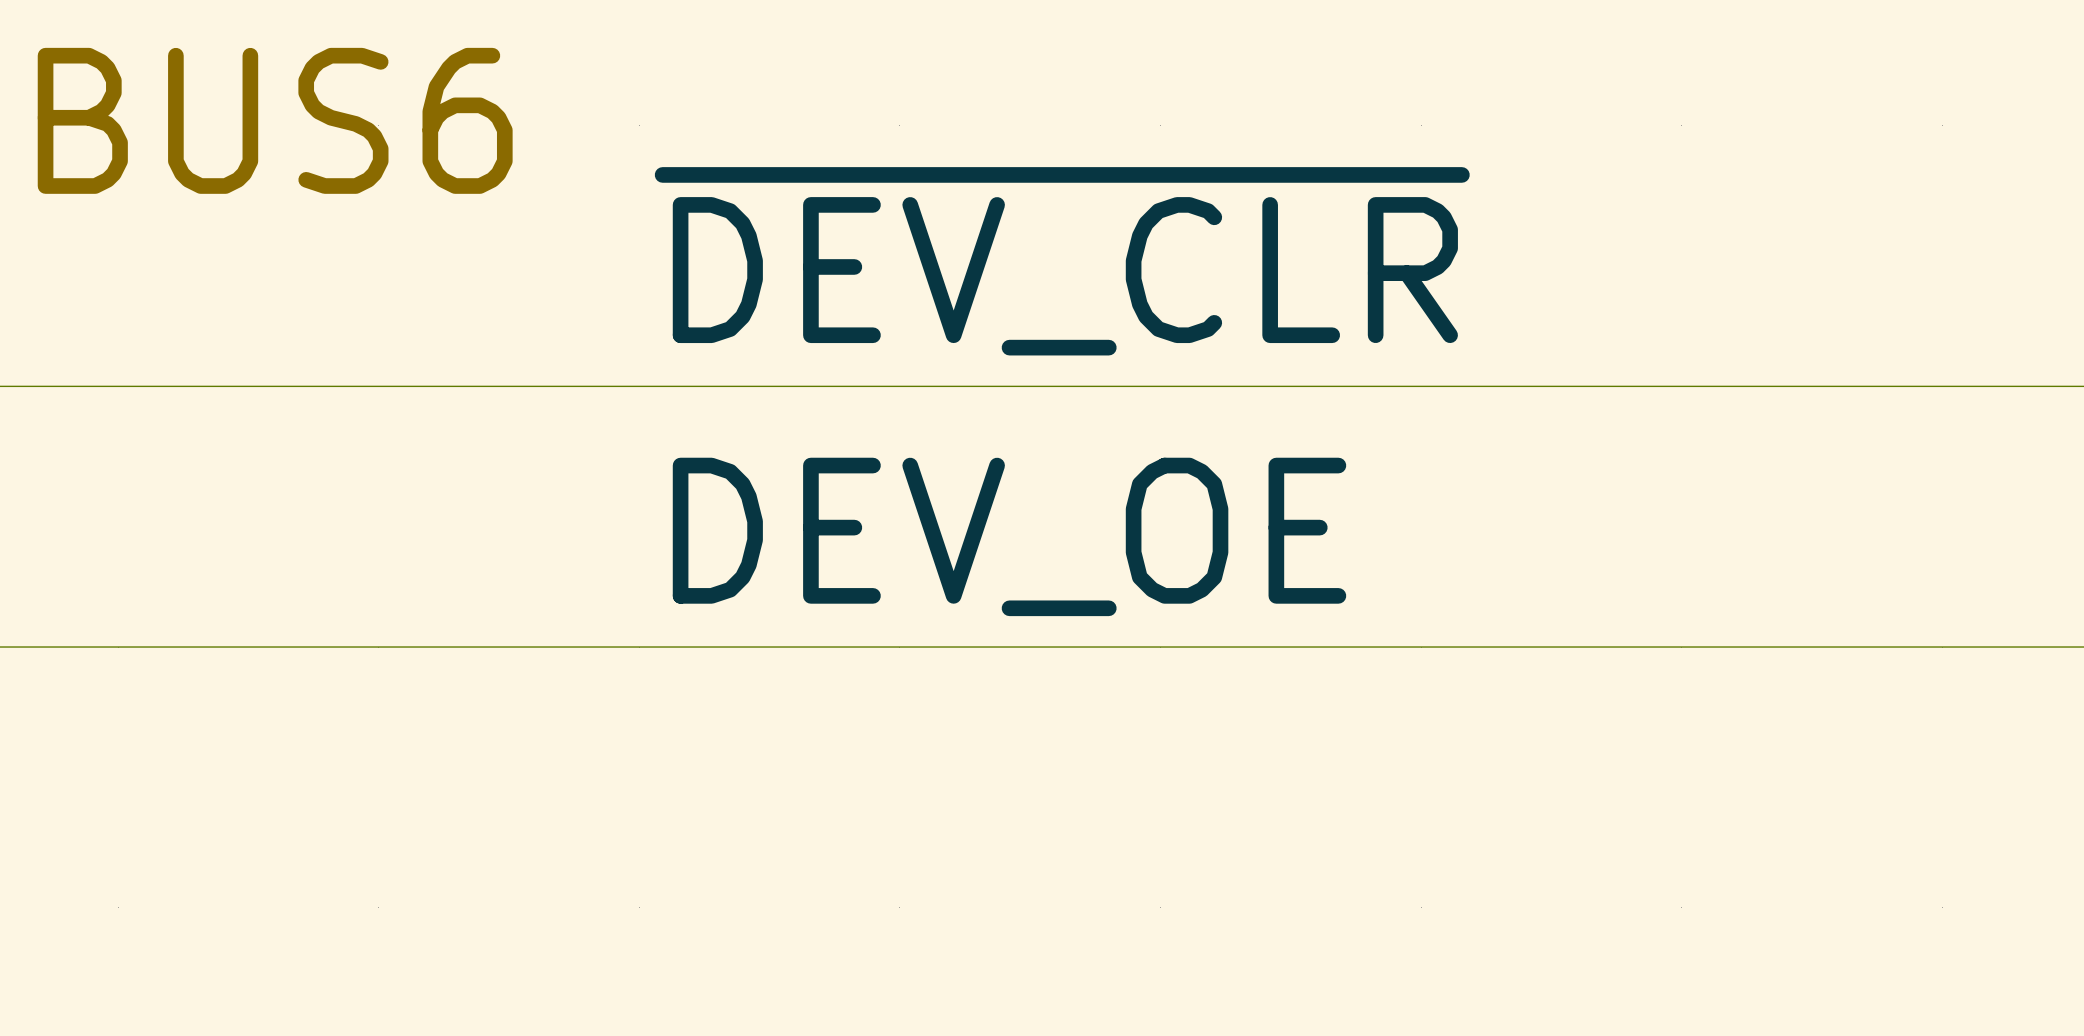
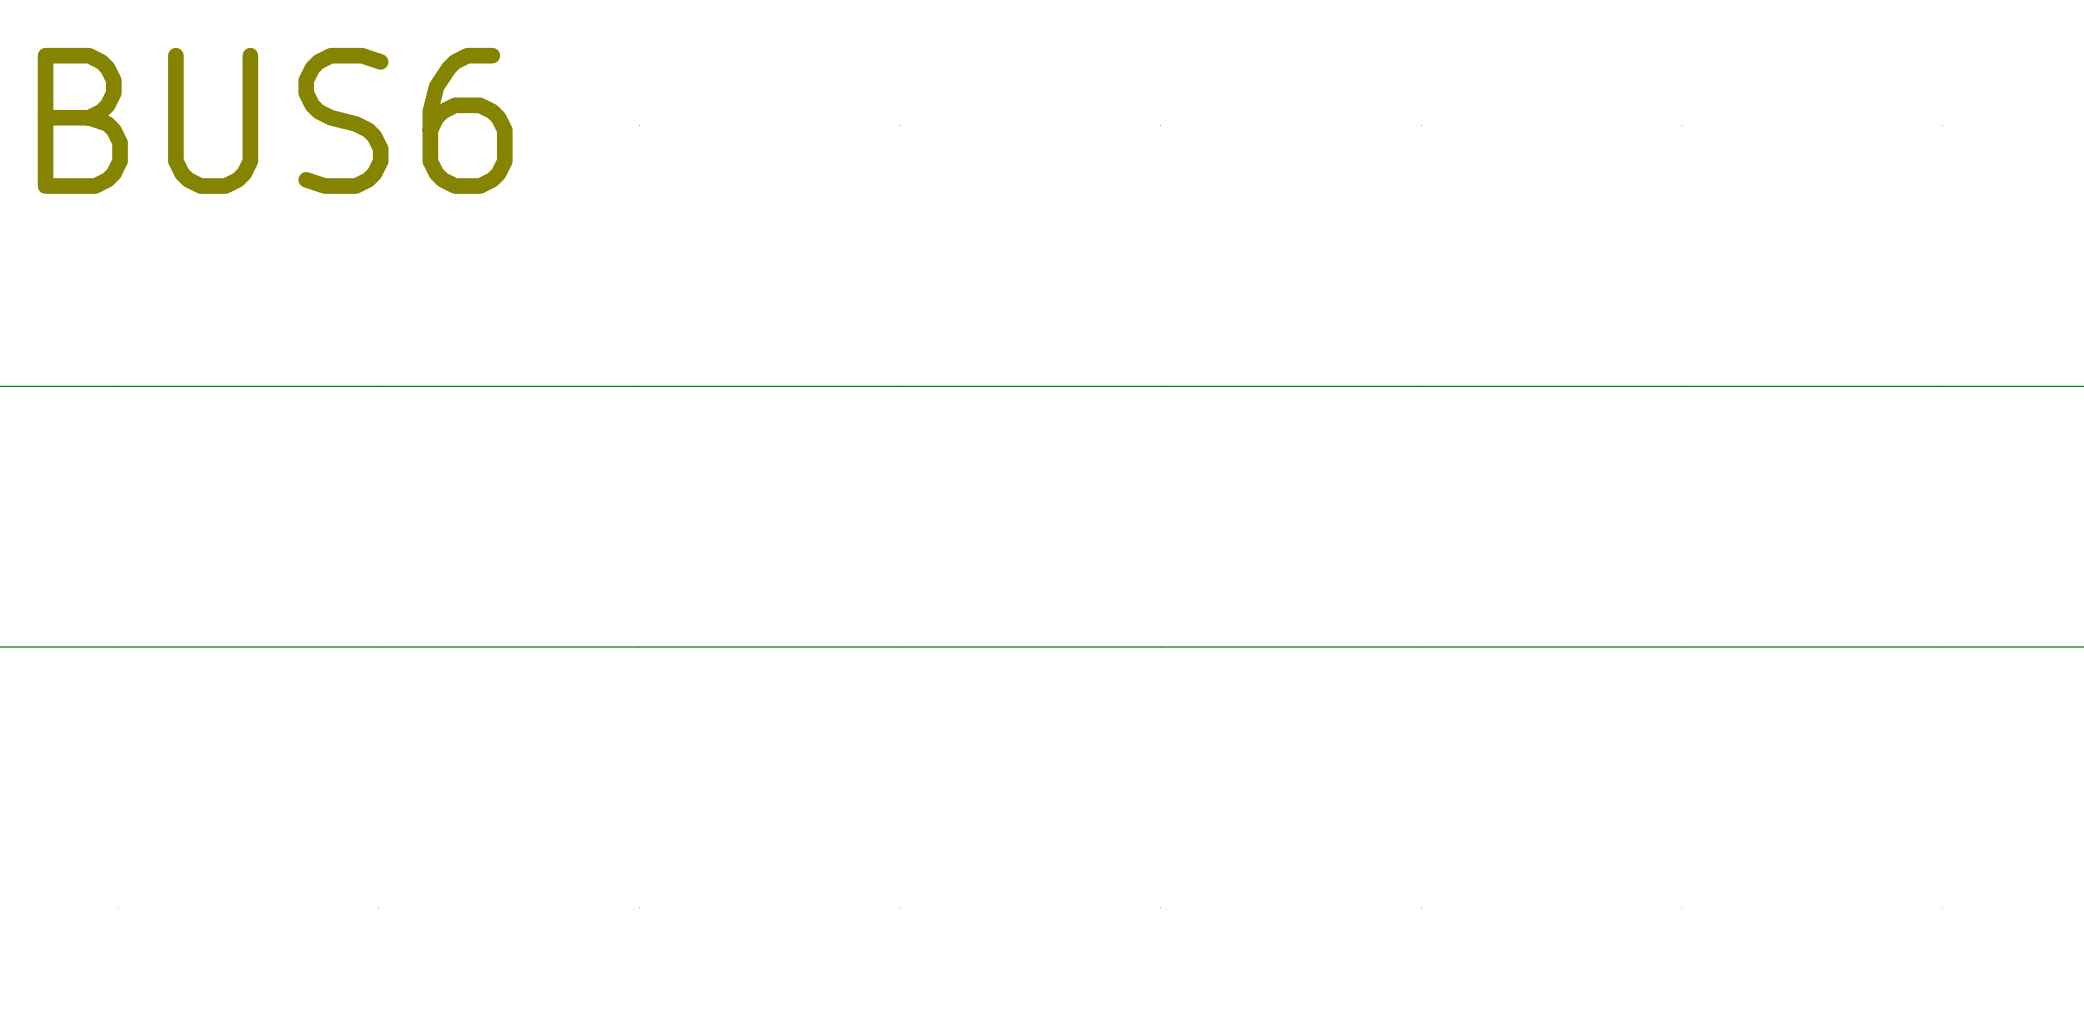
label: ~{DEV_CLR} (1062, 261) -> none
label: DEV_OE (1009, 536) -> none

